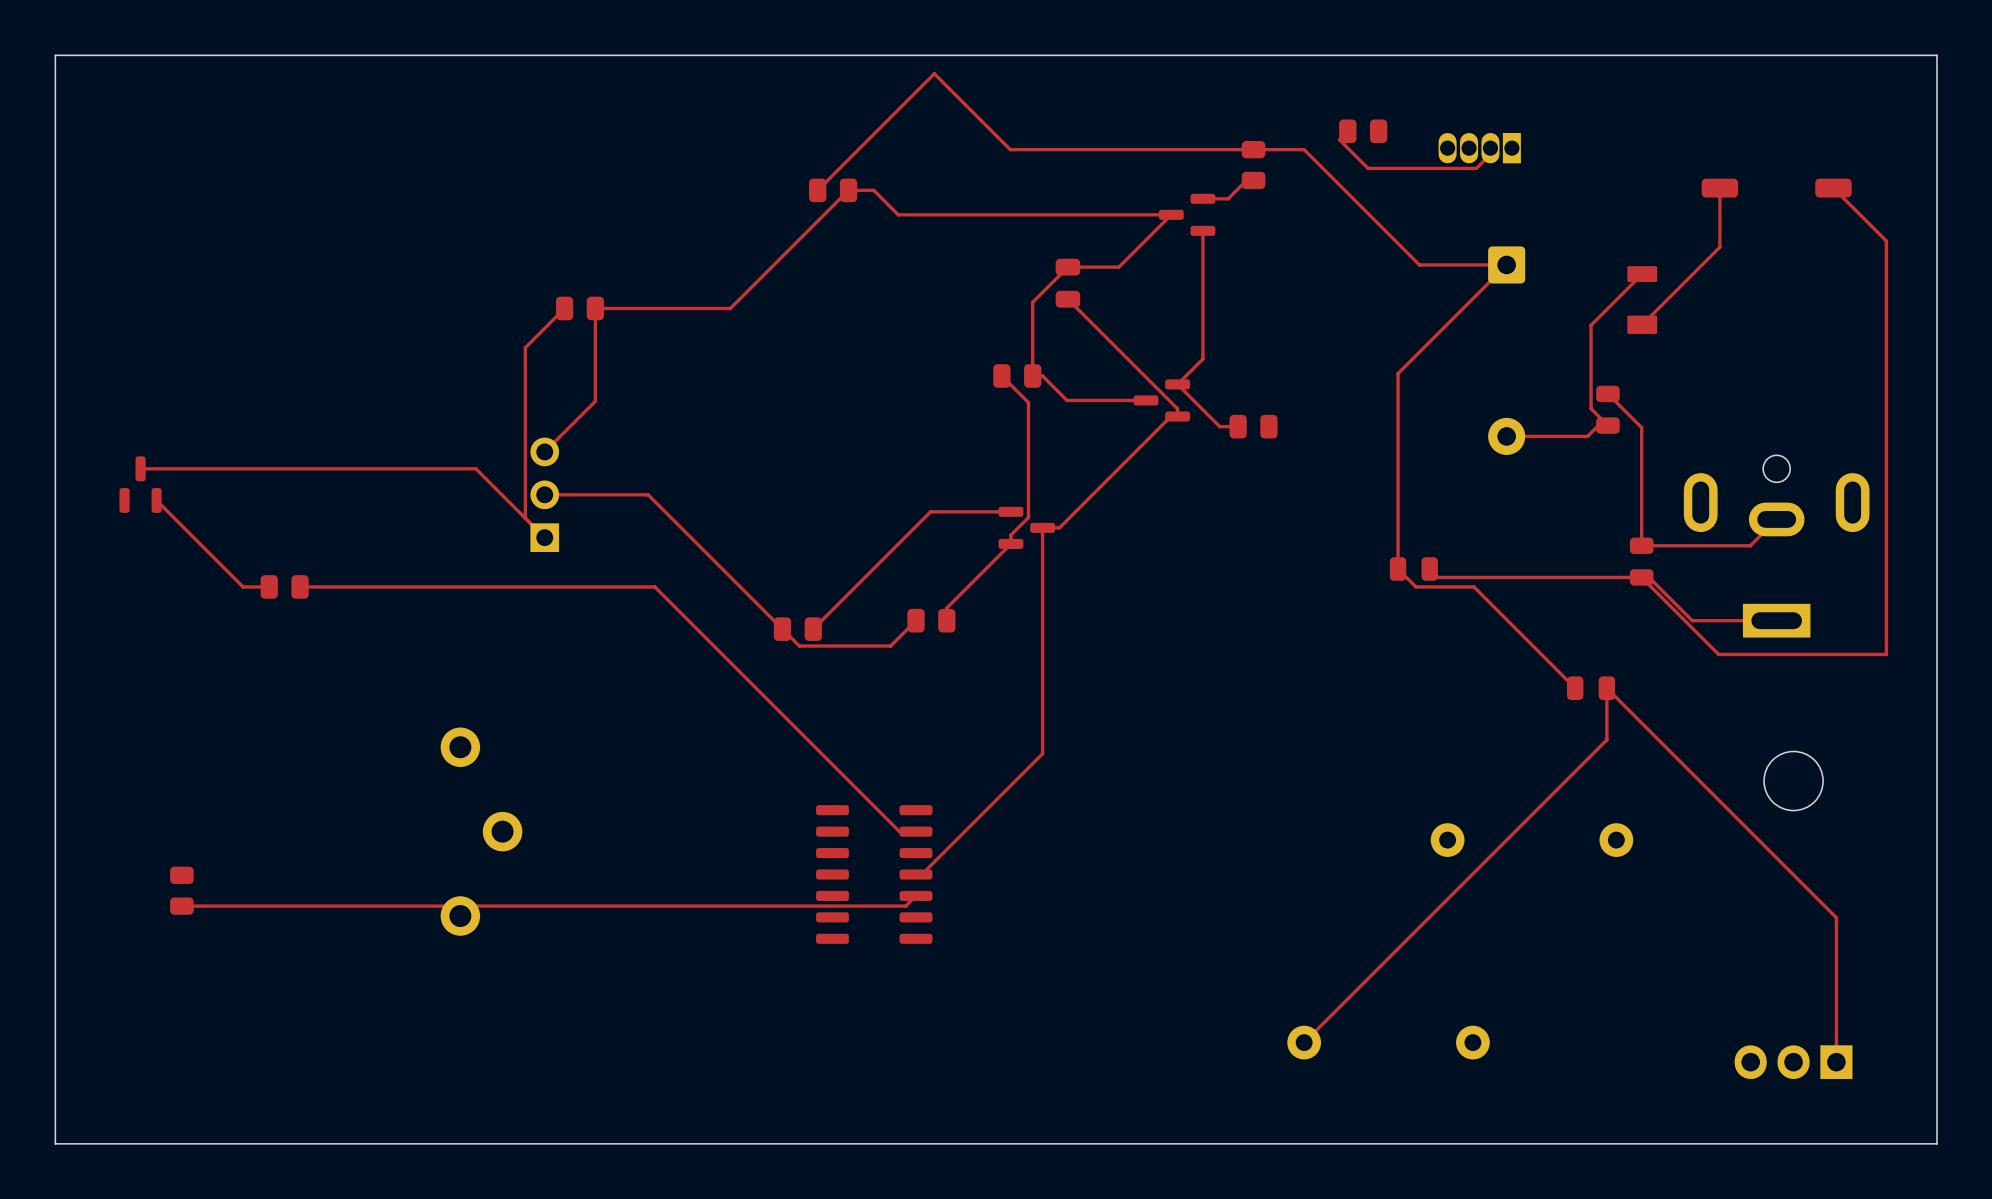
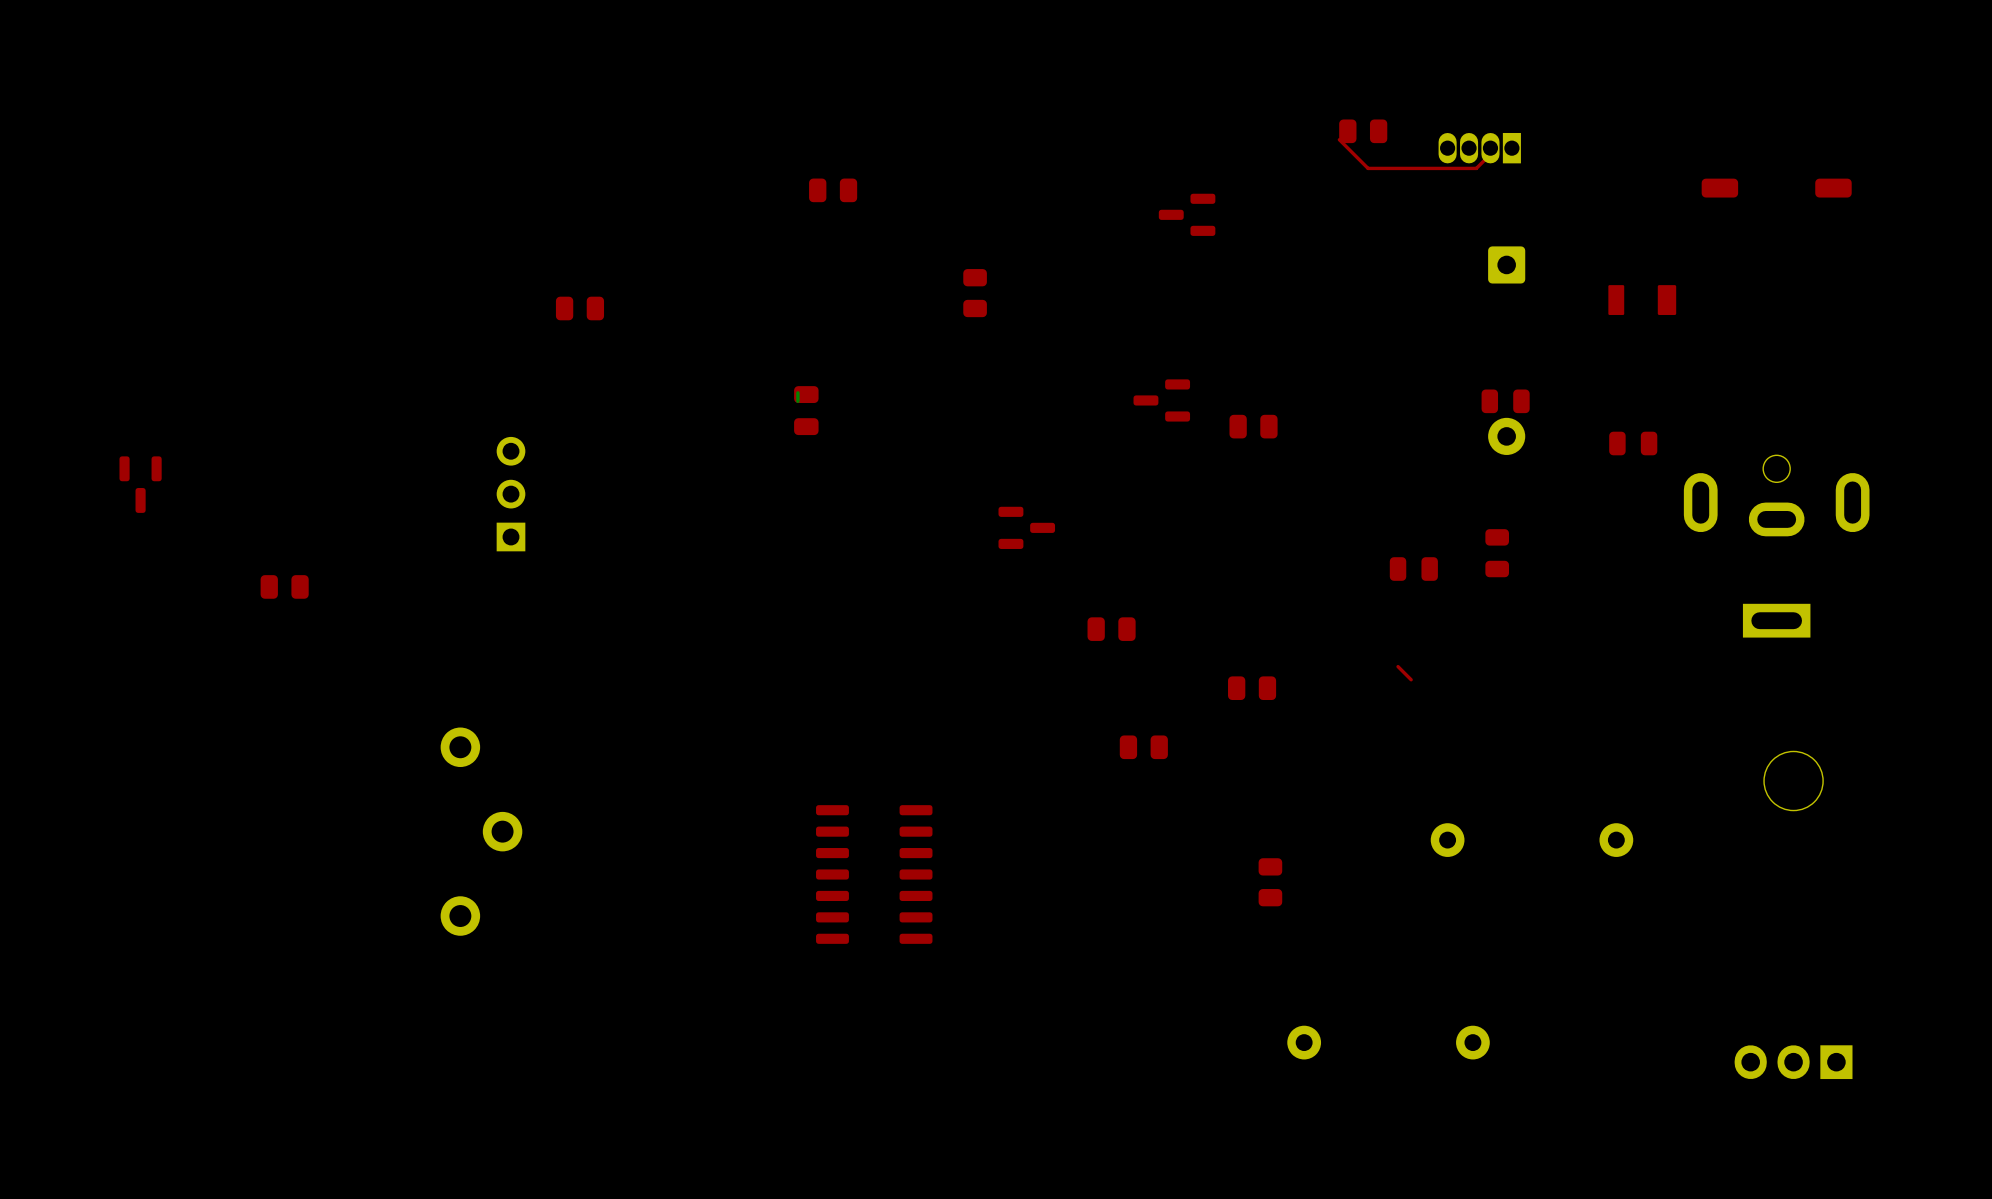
board edge: (1937, 55) (55, 55) (55, 1143) (1937, 1143) (1937, 55) -> none
part: (1253, 165) -> none
top track: (1253, 180) (1246, 180) (1228, 198) (1202, 198) -> none
top track: (1719, 188) (1719, 247) (1642, 324) -> none
top track: (1833, 188) (1886, 240) (1886, 654) (1718, 654) (1641, 577) -> none
top track: (817, 190) (934, 73) (1010, 149) (1304, 149) (1419, 264) (1506, 264) (1398, 373) (1398, 569) (1415, 586) (1473, 586) (1575, 688) -> none
top track: (1202, 230) (1202, 359) (1177, 384) (1219, 426) (1238, 426) -> none
top track: (1642, 274) (1591, 325) (1591, 408) (1607, 425) (1598, 425) (1587, 436) (1506, 436) (1517, 425) -> none
part position: (1067, 283) -> (806, 410)
top track: (1067, 299) (1177, 408) (1177, 416) (1170, 416) (1059, 527) (1042, 527) (1042, 753) (921, 874) (916, 874) -> none
part rotation: 0° (1642, 300) -> 90° counterclockwise (1642, 300)
top track: (559, 313) (525, 347) (525, 518) -> none
top track: (1001, 375) (1028, 402) (1028, 517) (1010, 535) (1010, 543) (946, 608) (946, 620) -> none
part rotation: 0° (1017, 375) -> 90° clockwise (975, 293)
part position: (1017, 375) -> (975, 293)
bottom track: none -> (797, 392) (797, 401)
top track: (1607, 393) (1641, 427) (1641, 545) (1750, 545) (1776, 519) -> none
top track: (1145, 400) (1067, 400) (1042, 375) (1032, 375) (1032, 302) (1067, 267) (1118, 267) (1171, 214) (898, 214) (873, 190) (848, 190) (730, 308) (595, 308) (595, 401) (544, 451) -> none
part: none -> (1505, 401)
part rotation: 0° (1607, 409) -> 90° clockwise (1633, 443)
part position: (1607, 409) -> (1633, 443)
top track: (140, 468) (475, 468) (544, 537) -> none
part rotation: 0° (140, 484) -> 180° (140, 484)
top track: (544, 494) (648, 494) (799, 646) (890, 646) (916, 620) -> none
part position: (544, 494) -> (511, 494)
top track: (156, 500) (243, 586) (269, 586) -> none
top track: (1010, 511) (930, 511) (813, 629) -> none
part: none -> (1497, 553)
part: (1641, 561) -> none
top track: (1429, 569) (1438, 577) (1649, 577) (1692, 620) (1776, 620) -> none
top track: (300, 586) (654, 586) (899, 831) (916, 831) -> none
part: (931, 620) -> none
part: (797, 629) -> none
part: none -> (1111, 629)
top track: none -> (1398, 666) (1411, 679)
part: none -> (1252, 688)
part: (1591, 688) -> none
part: none -> (1143, 747)
part: none -> (1270, 882)
part: (181, 890) -> none
top track: (916, 895) (905, 906) (470, 906) (460, 916) (450, 906) (181, 906) -> none
top track: (1304, 1042) (1606, 739) (1606, 688) (1836, 917) (1836, 1062) -> none

